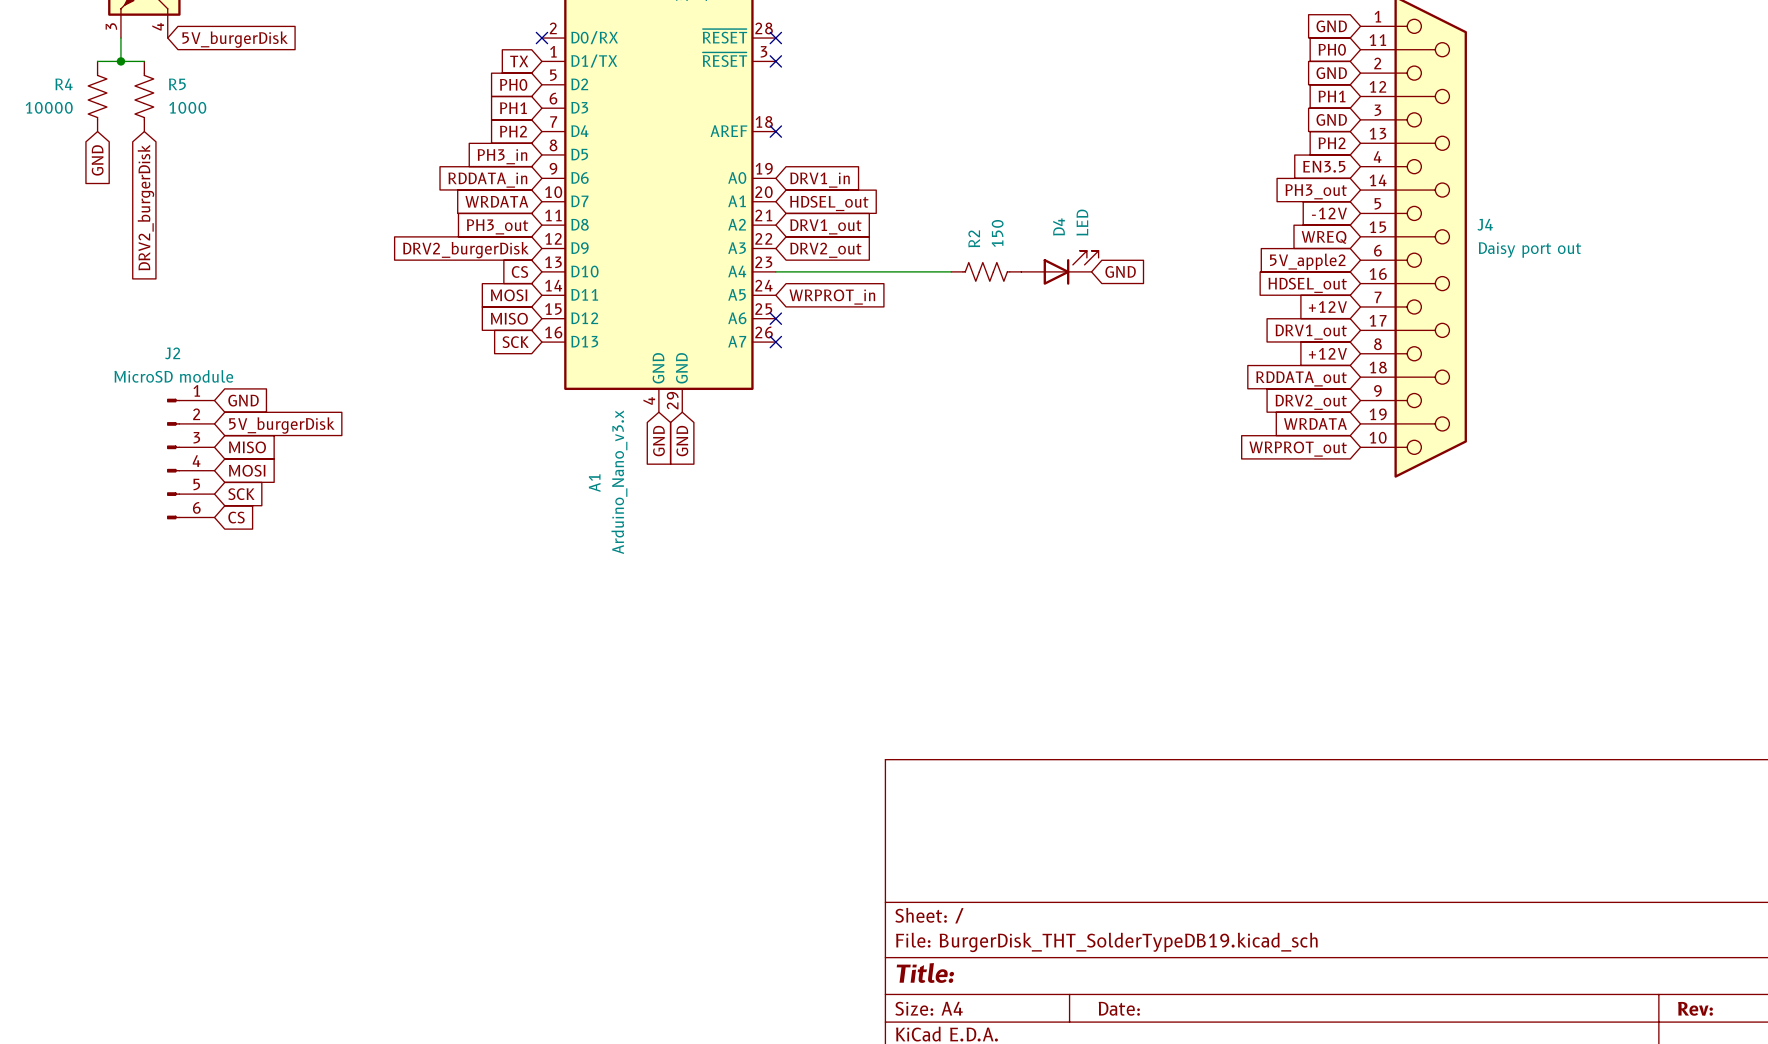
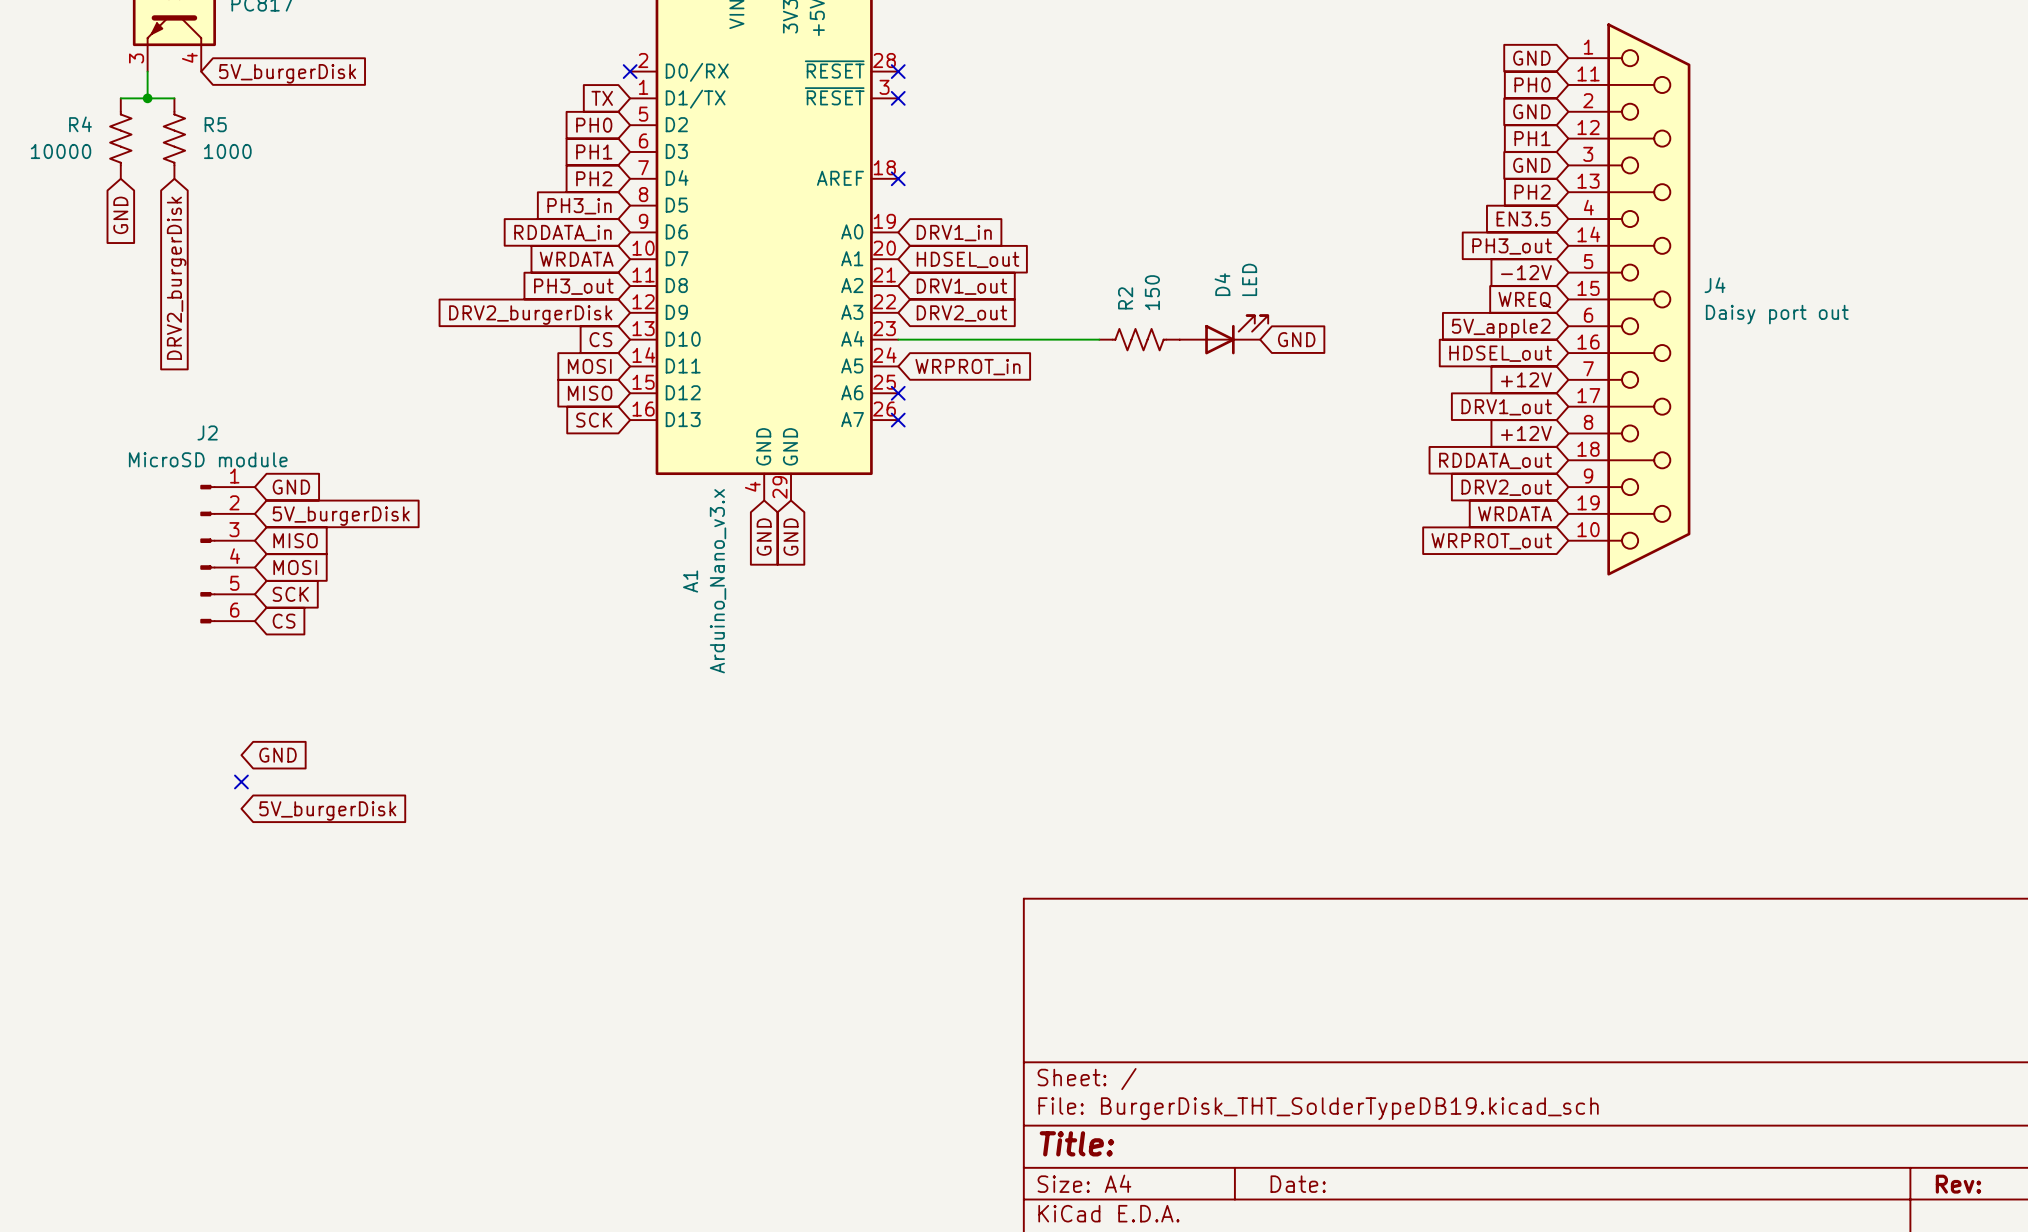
global label: none -> GND (278, 755)
no-connect mark: none -> (241, 781)
global label: none -> 5V_burgerDisk (327, 811)

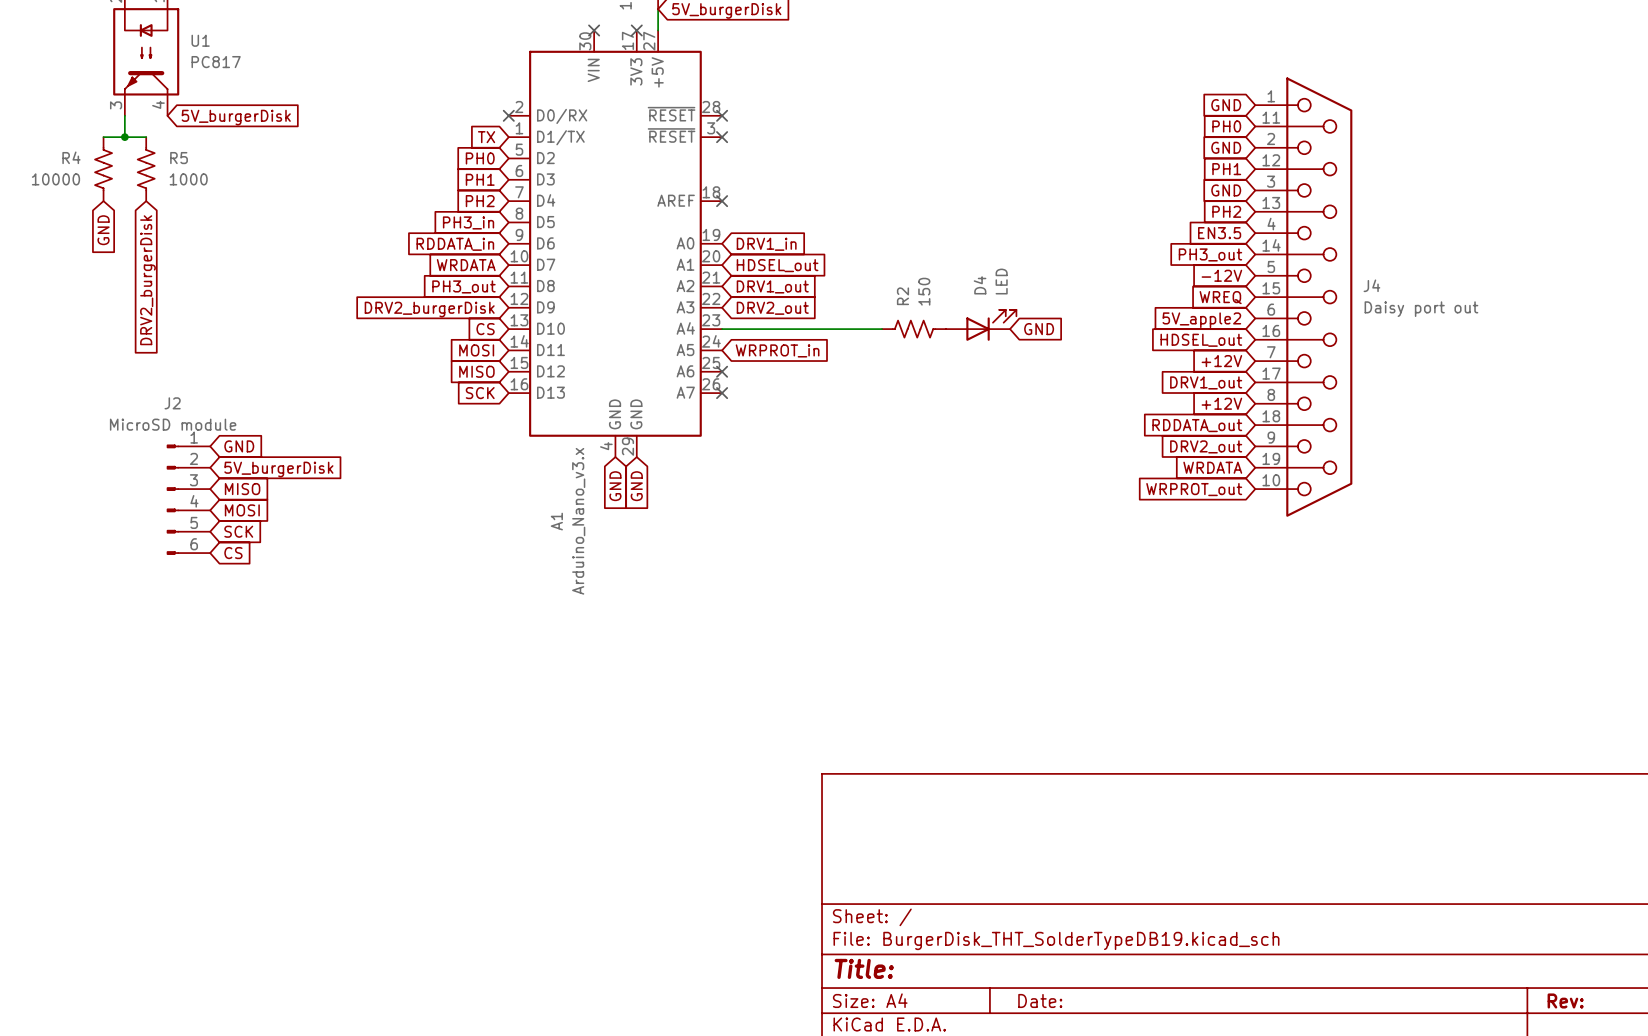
global label: GND (278, 755) -> none
no-connect mark: (241, 781) -> none
global label: 5V_burgerDisk (327, 811) -> none

